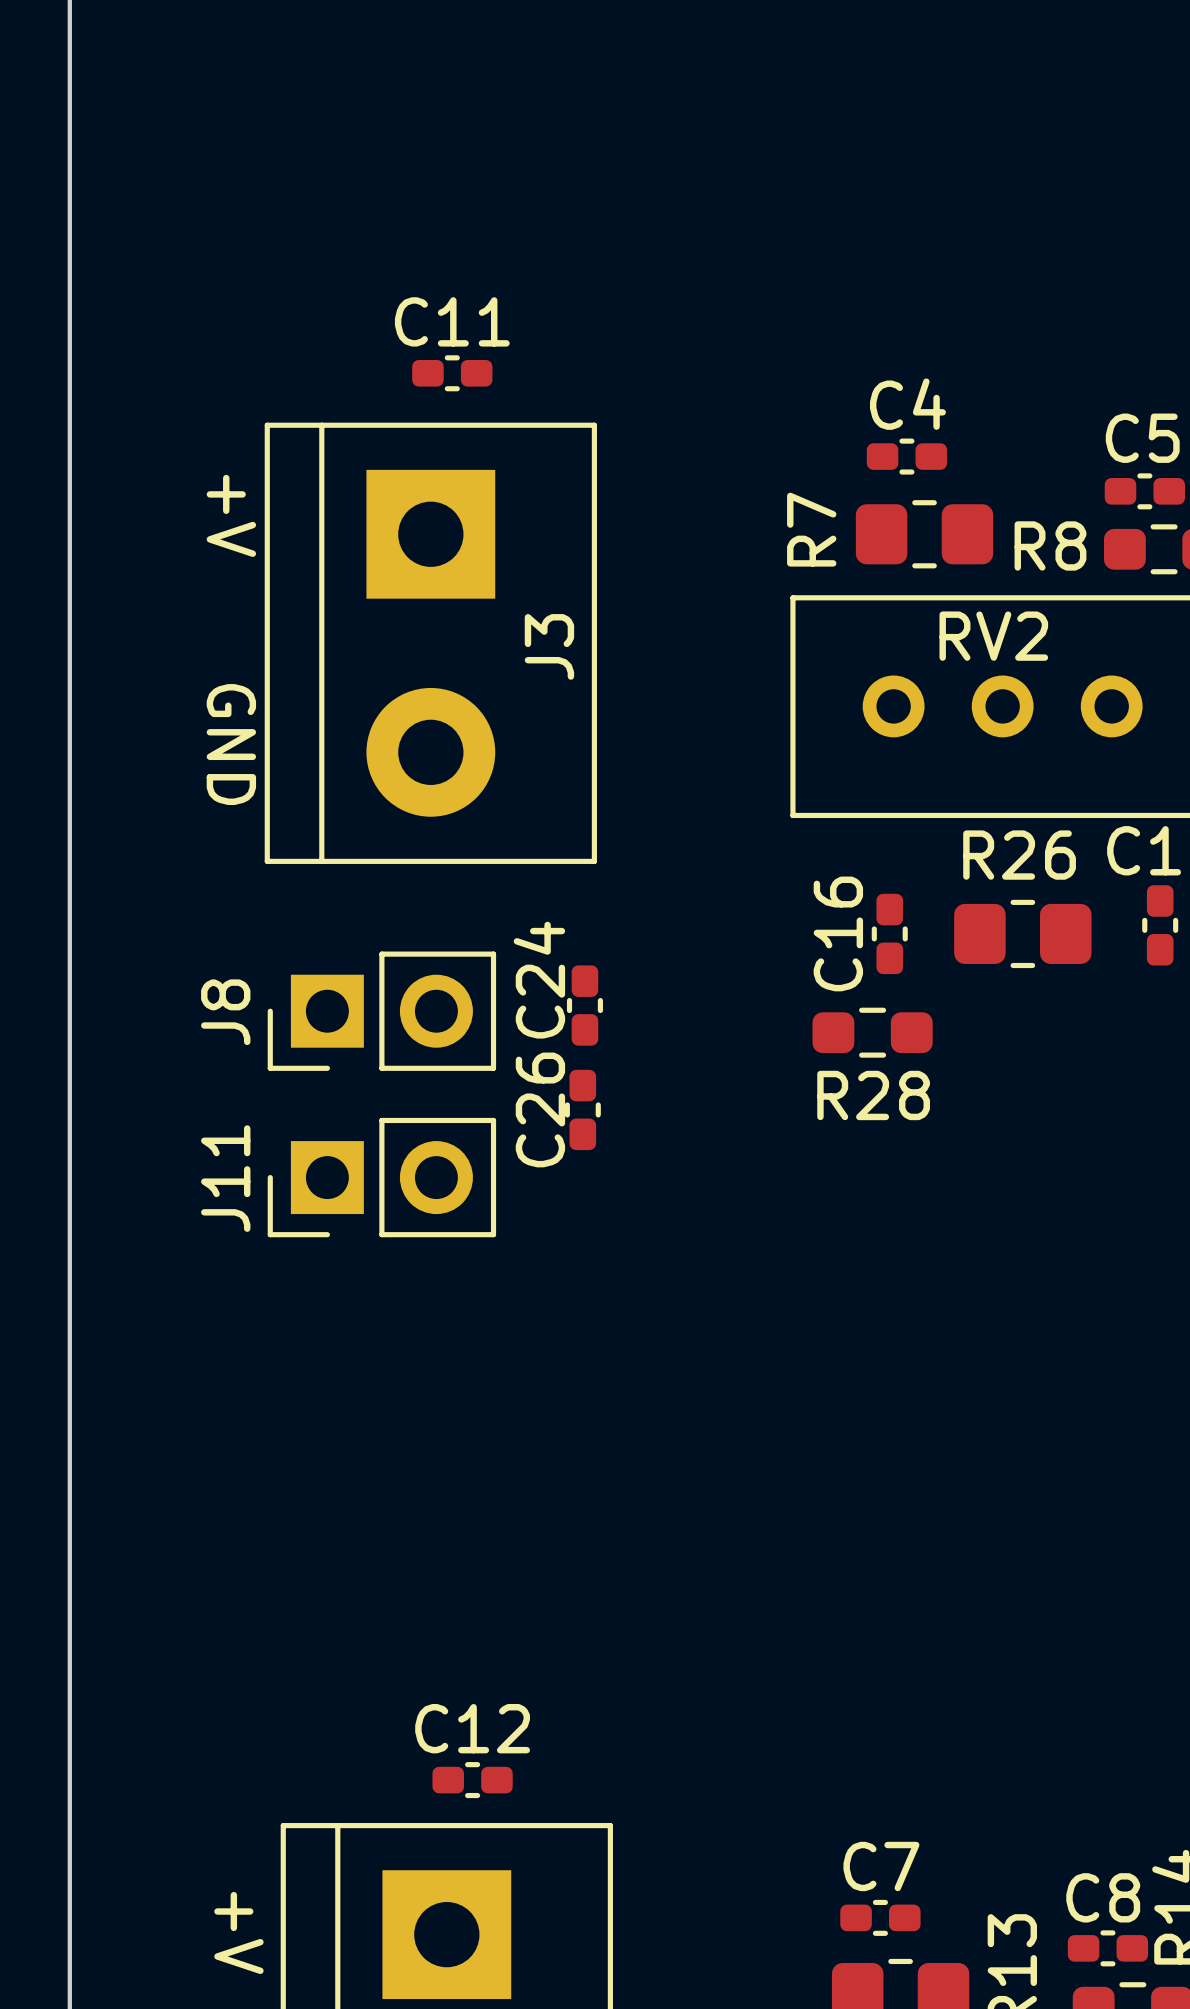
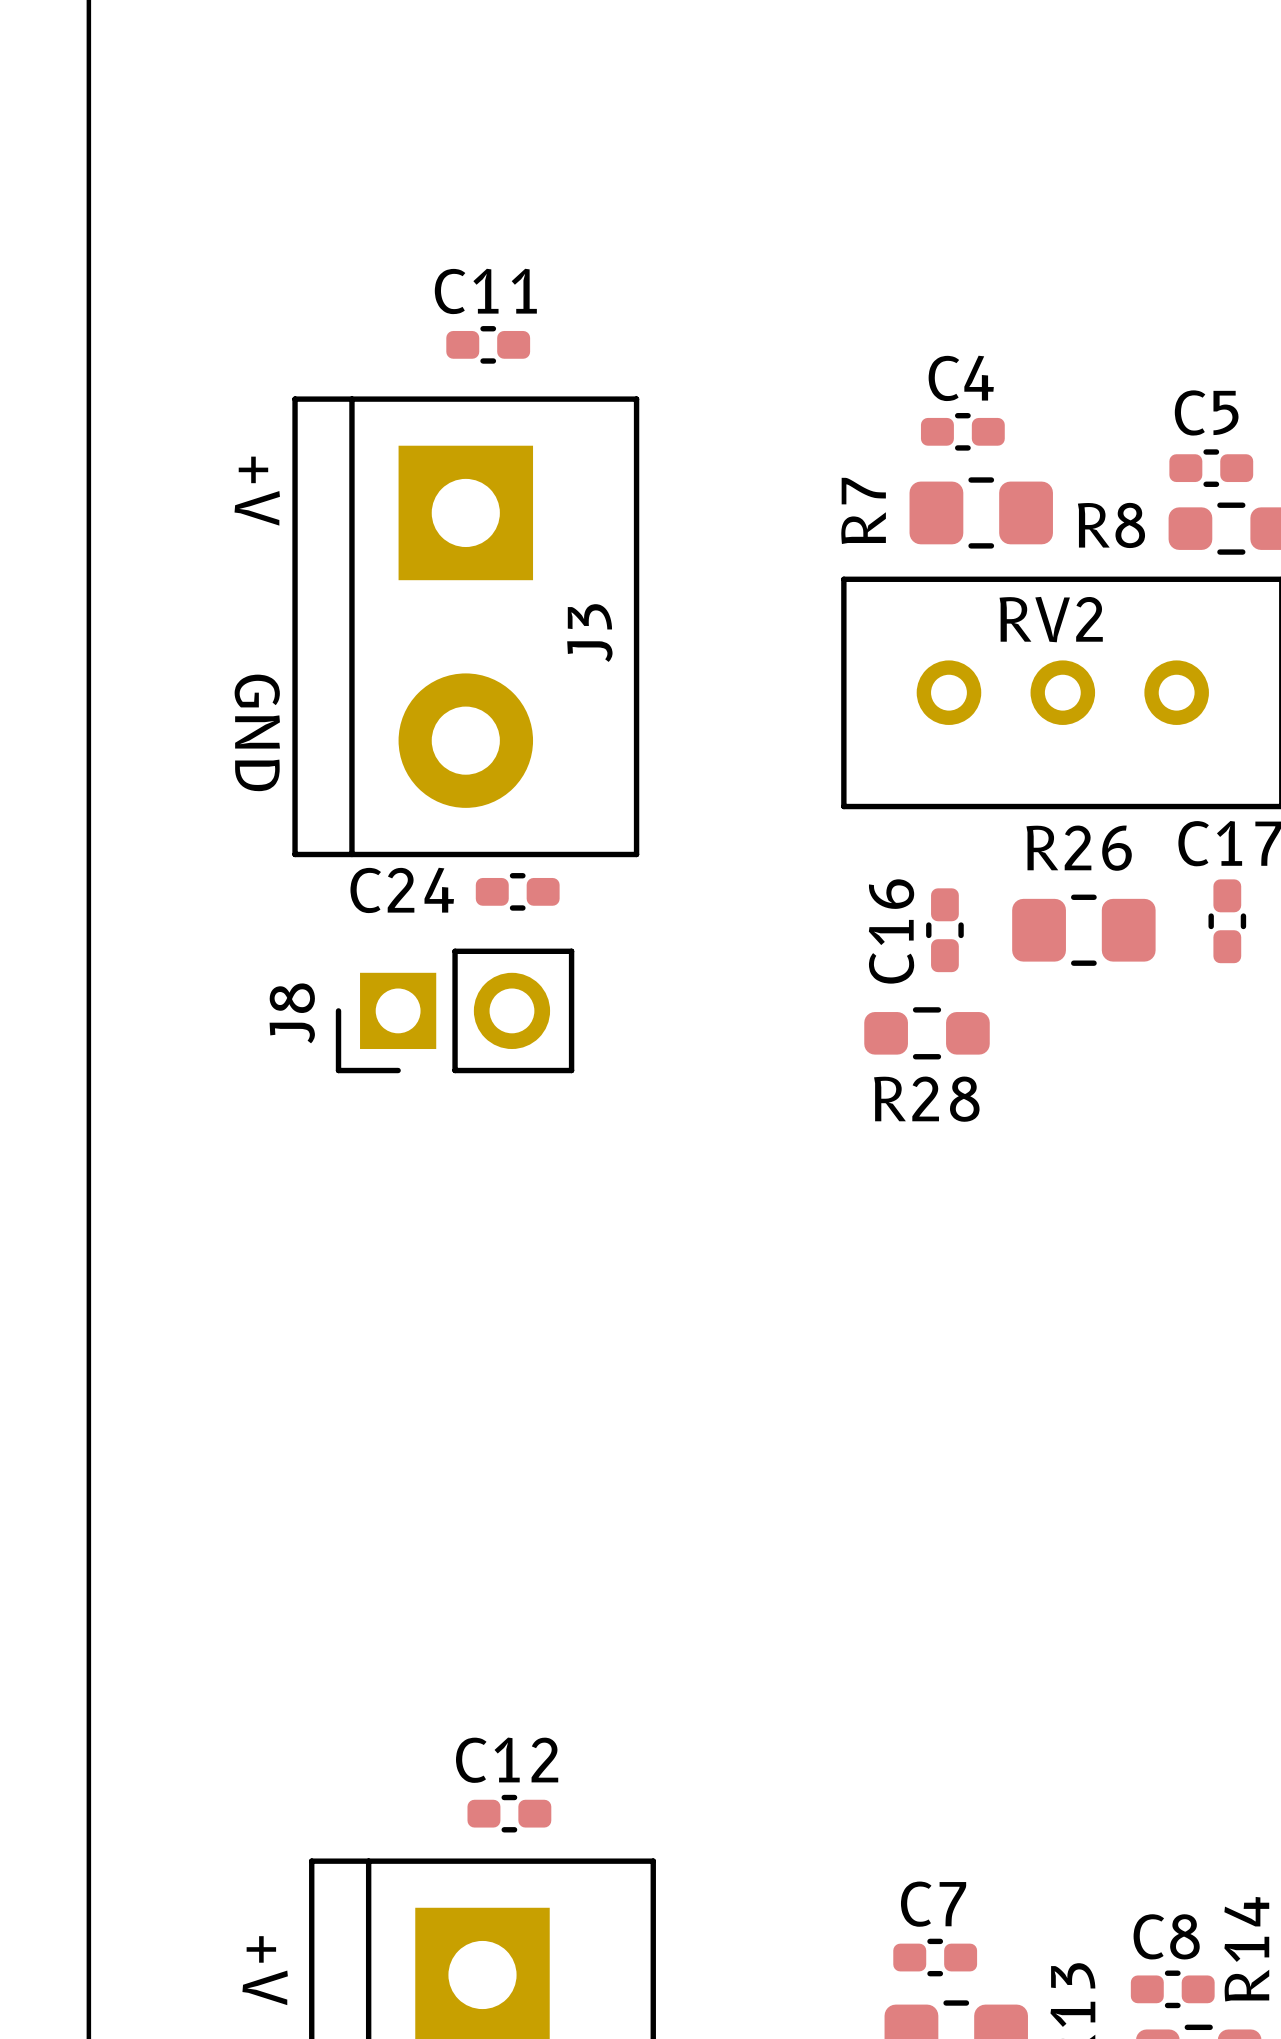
C24 rotation: 0° (584, 1005) -> 90° clockwise (517, 891)
C24 position: (584, 1005) -> (517, 891)
J8 position: (381, 1011) -> (455, 1010)
C26: (582, 1109) -> none
J11: (381, 1177) -> none

